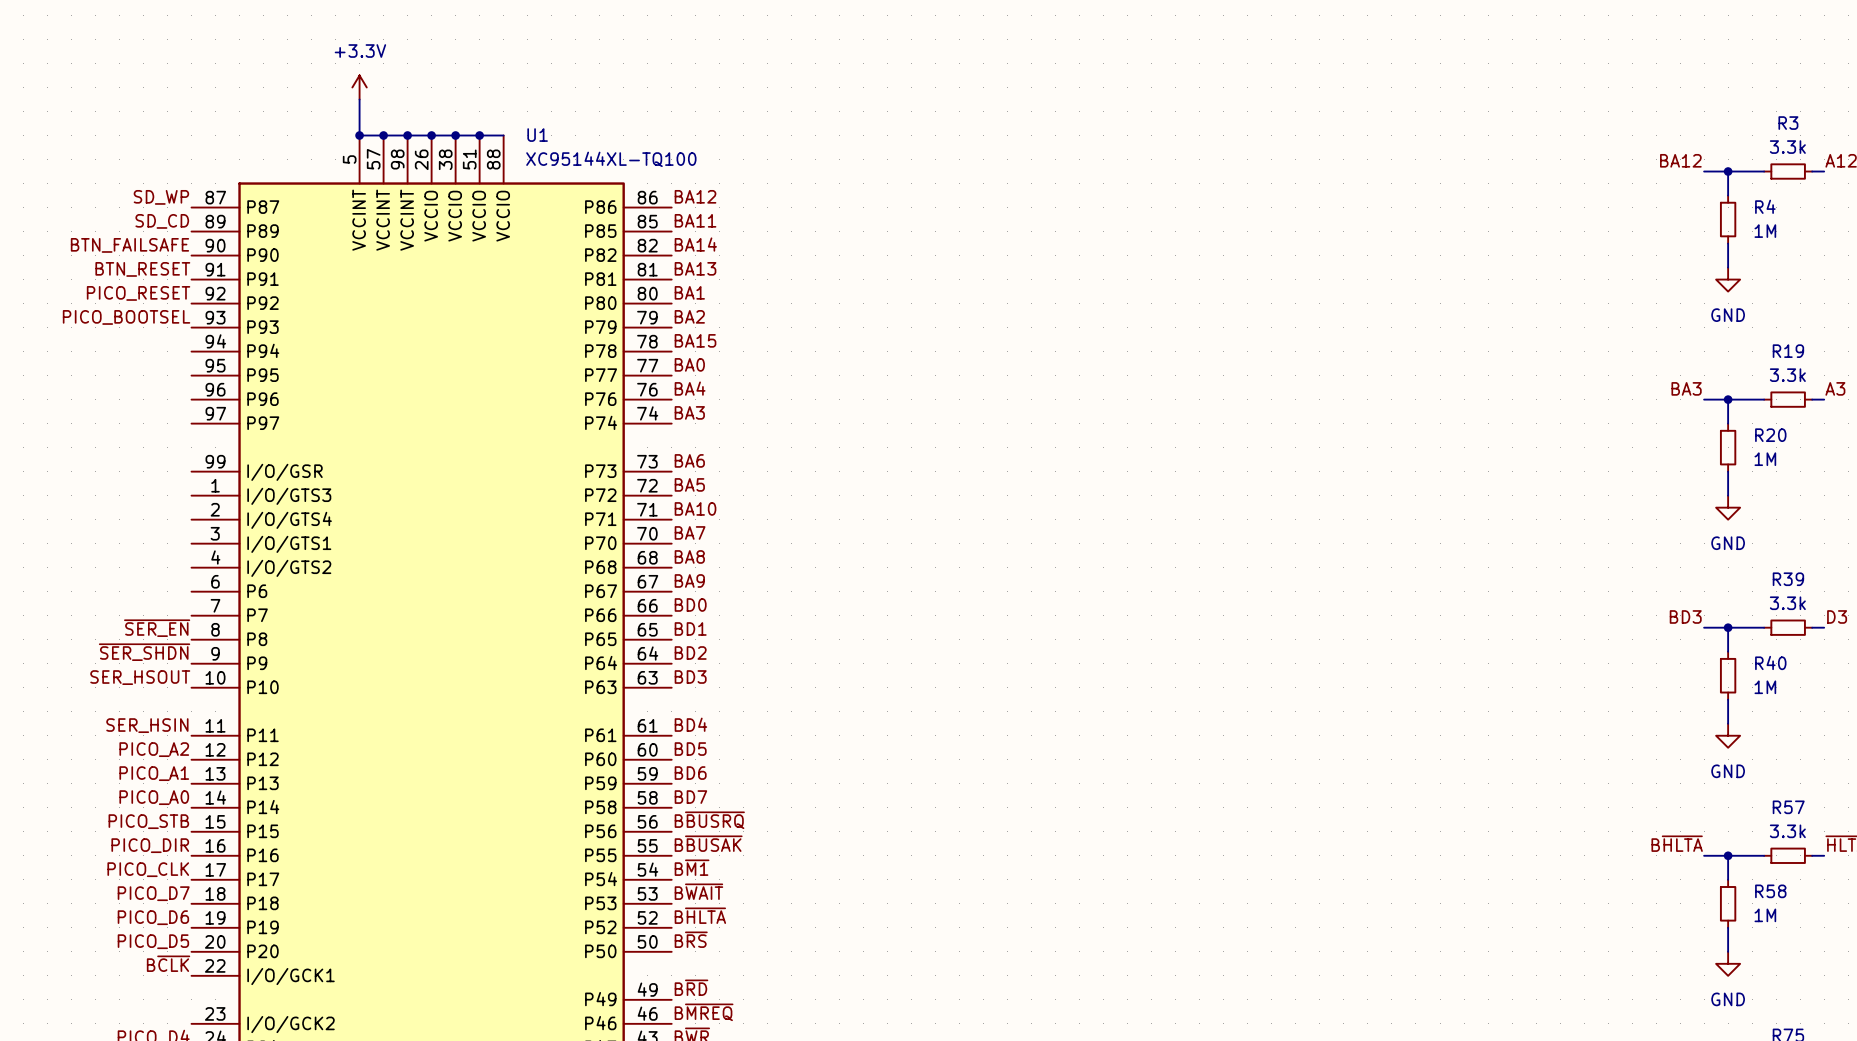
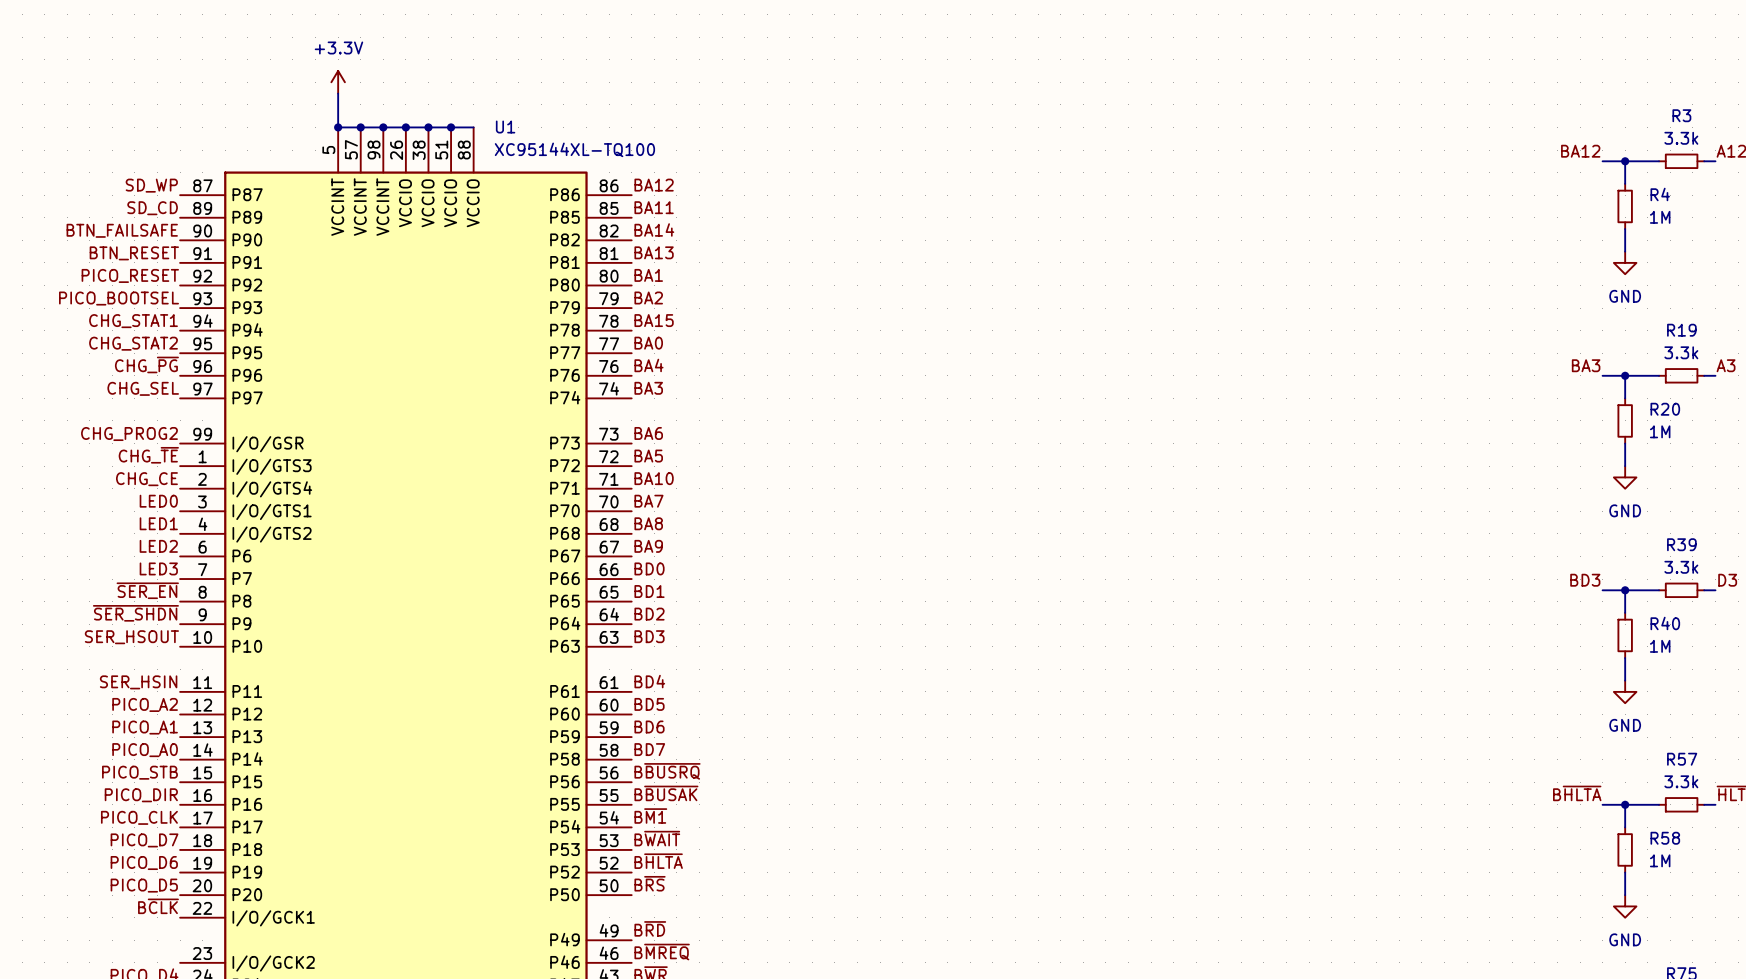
label: none -> CHG_STAT1 (133, 321)
label: none -> CHG_STAT2 (133, 343)
label: none -> CHG_~{PG} (146, 364)
label: none -> CHG_SEL (143, 388)
label: none -> CHG_PROG2 (129, 434)
label: none -> CHG_~{TE} (148, 455)
label: none -> CHG_CE (146, 479)
label: none -> LED0 (158, 501)
label: none -> LED1 (158, 523)
label: none -> LED2 (158, 546)
label: none -> LED3 (158, 568)

